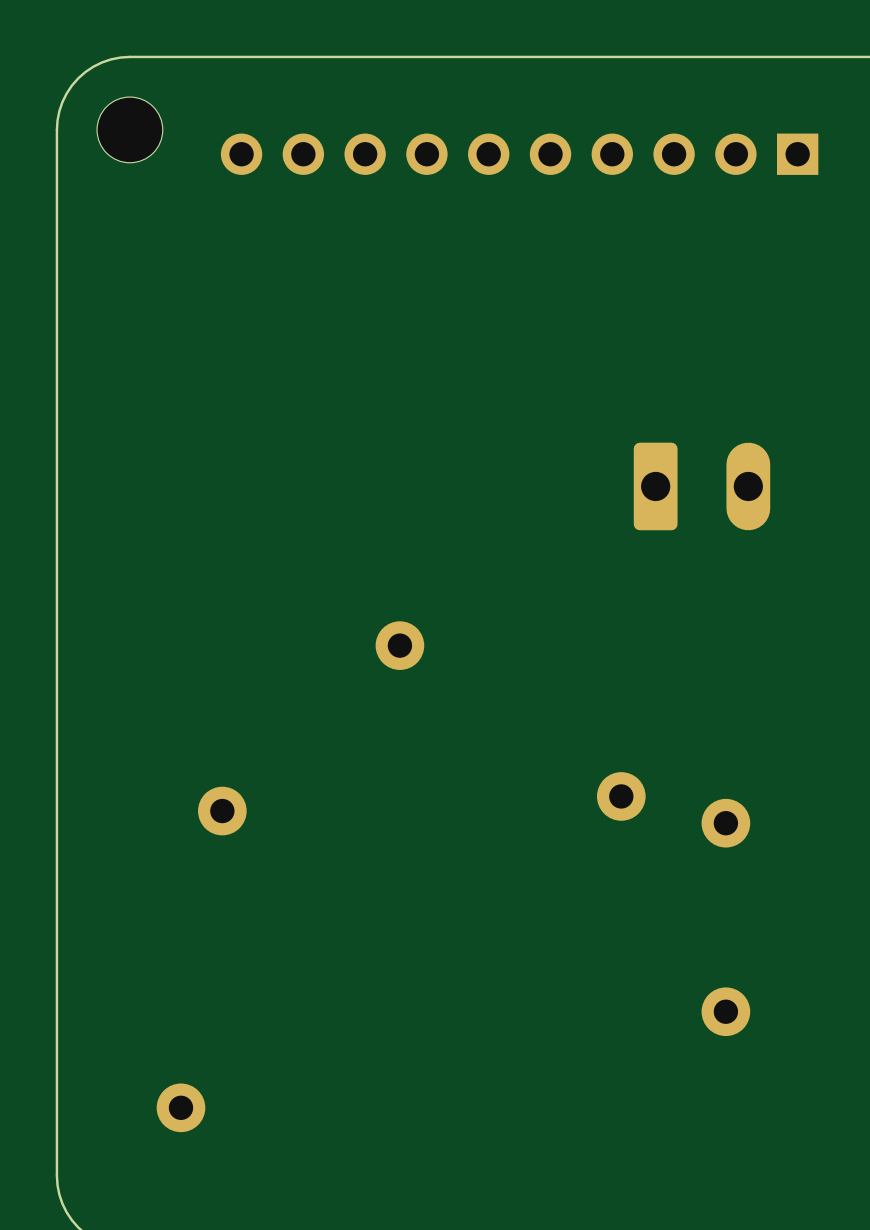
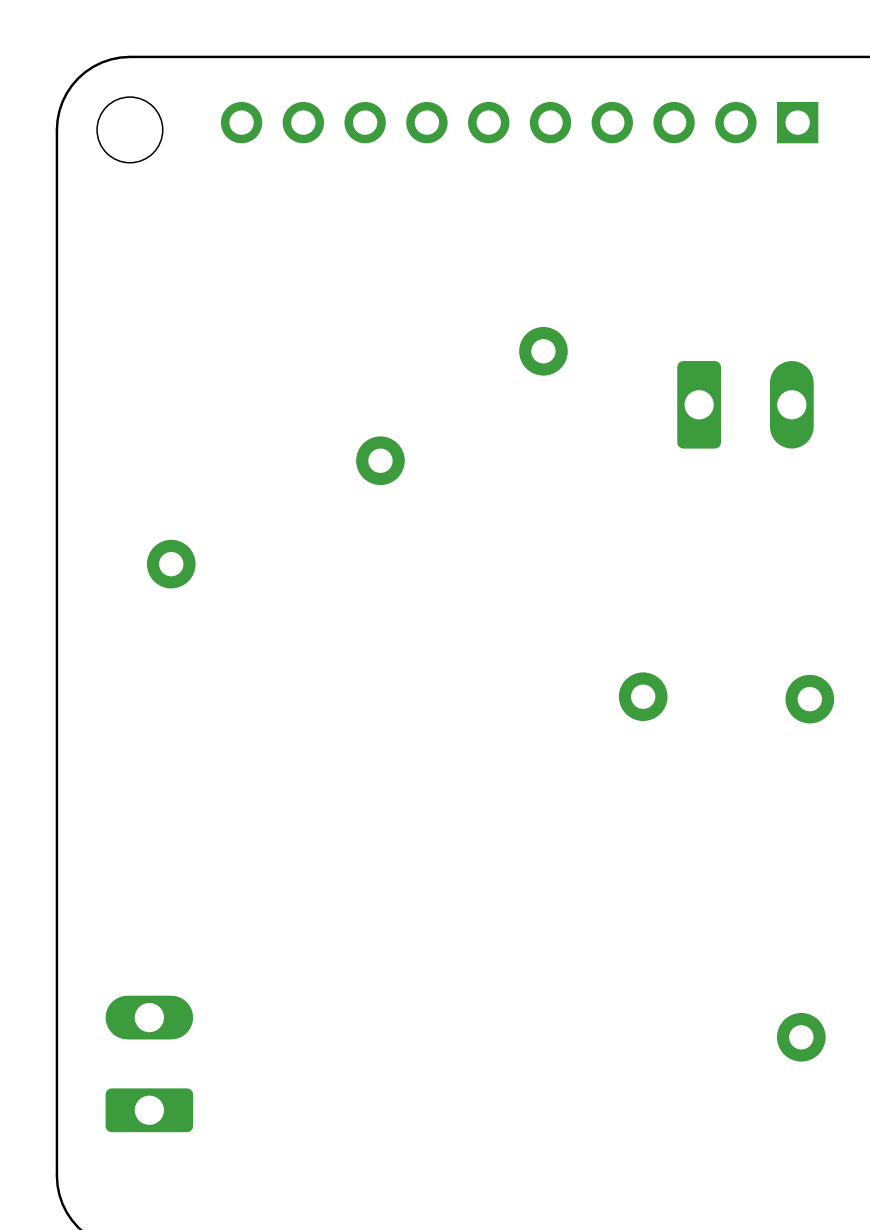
part position: (519, 154) -> (519, 122)
part: none -> (543, 351)
part: none -> (380, 460)
part position: (702, 486) -> (745, 404)
part: none -> (171, 564)
part: (399, 645) -> none
part: none -> (643, 696)
part: none -> (809, 699)
part: (621, 796) -> none
part: (222, 811) -> none
part: (725, 823) -> none
part: (725, 1011) -> none
part: none -> (801, 1037)
part: none -> (149, 1063)
part: (180, 1107) -> none

